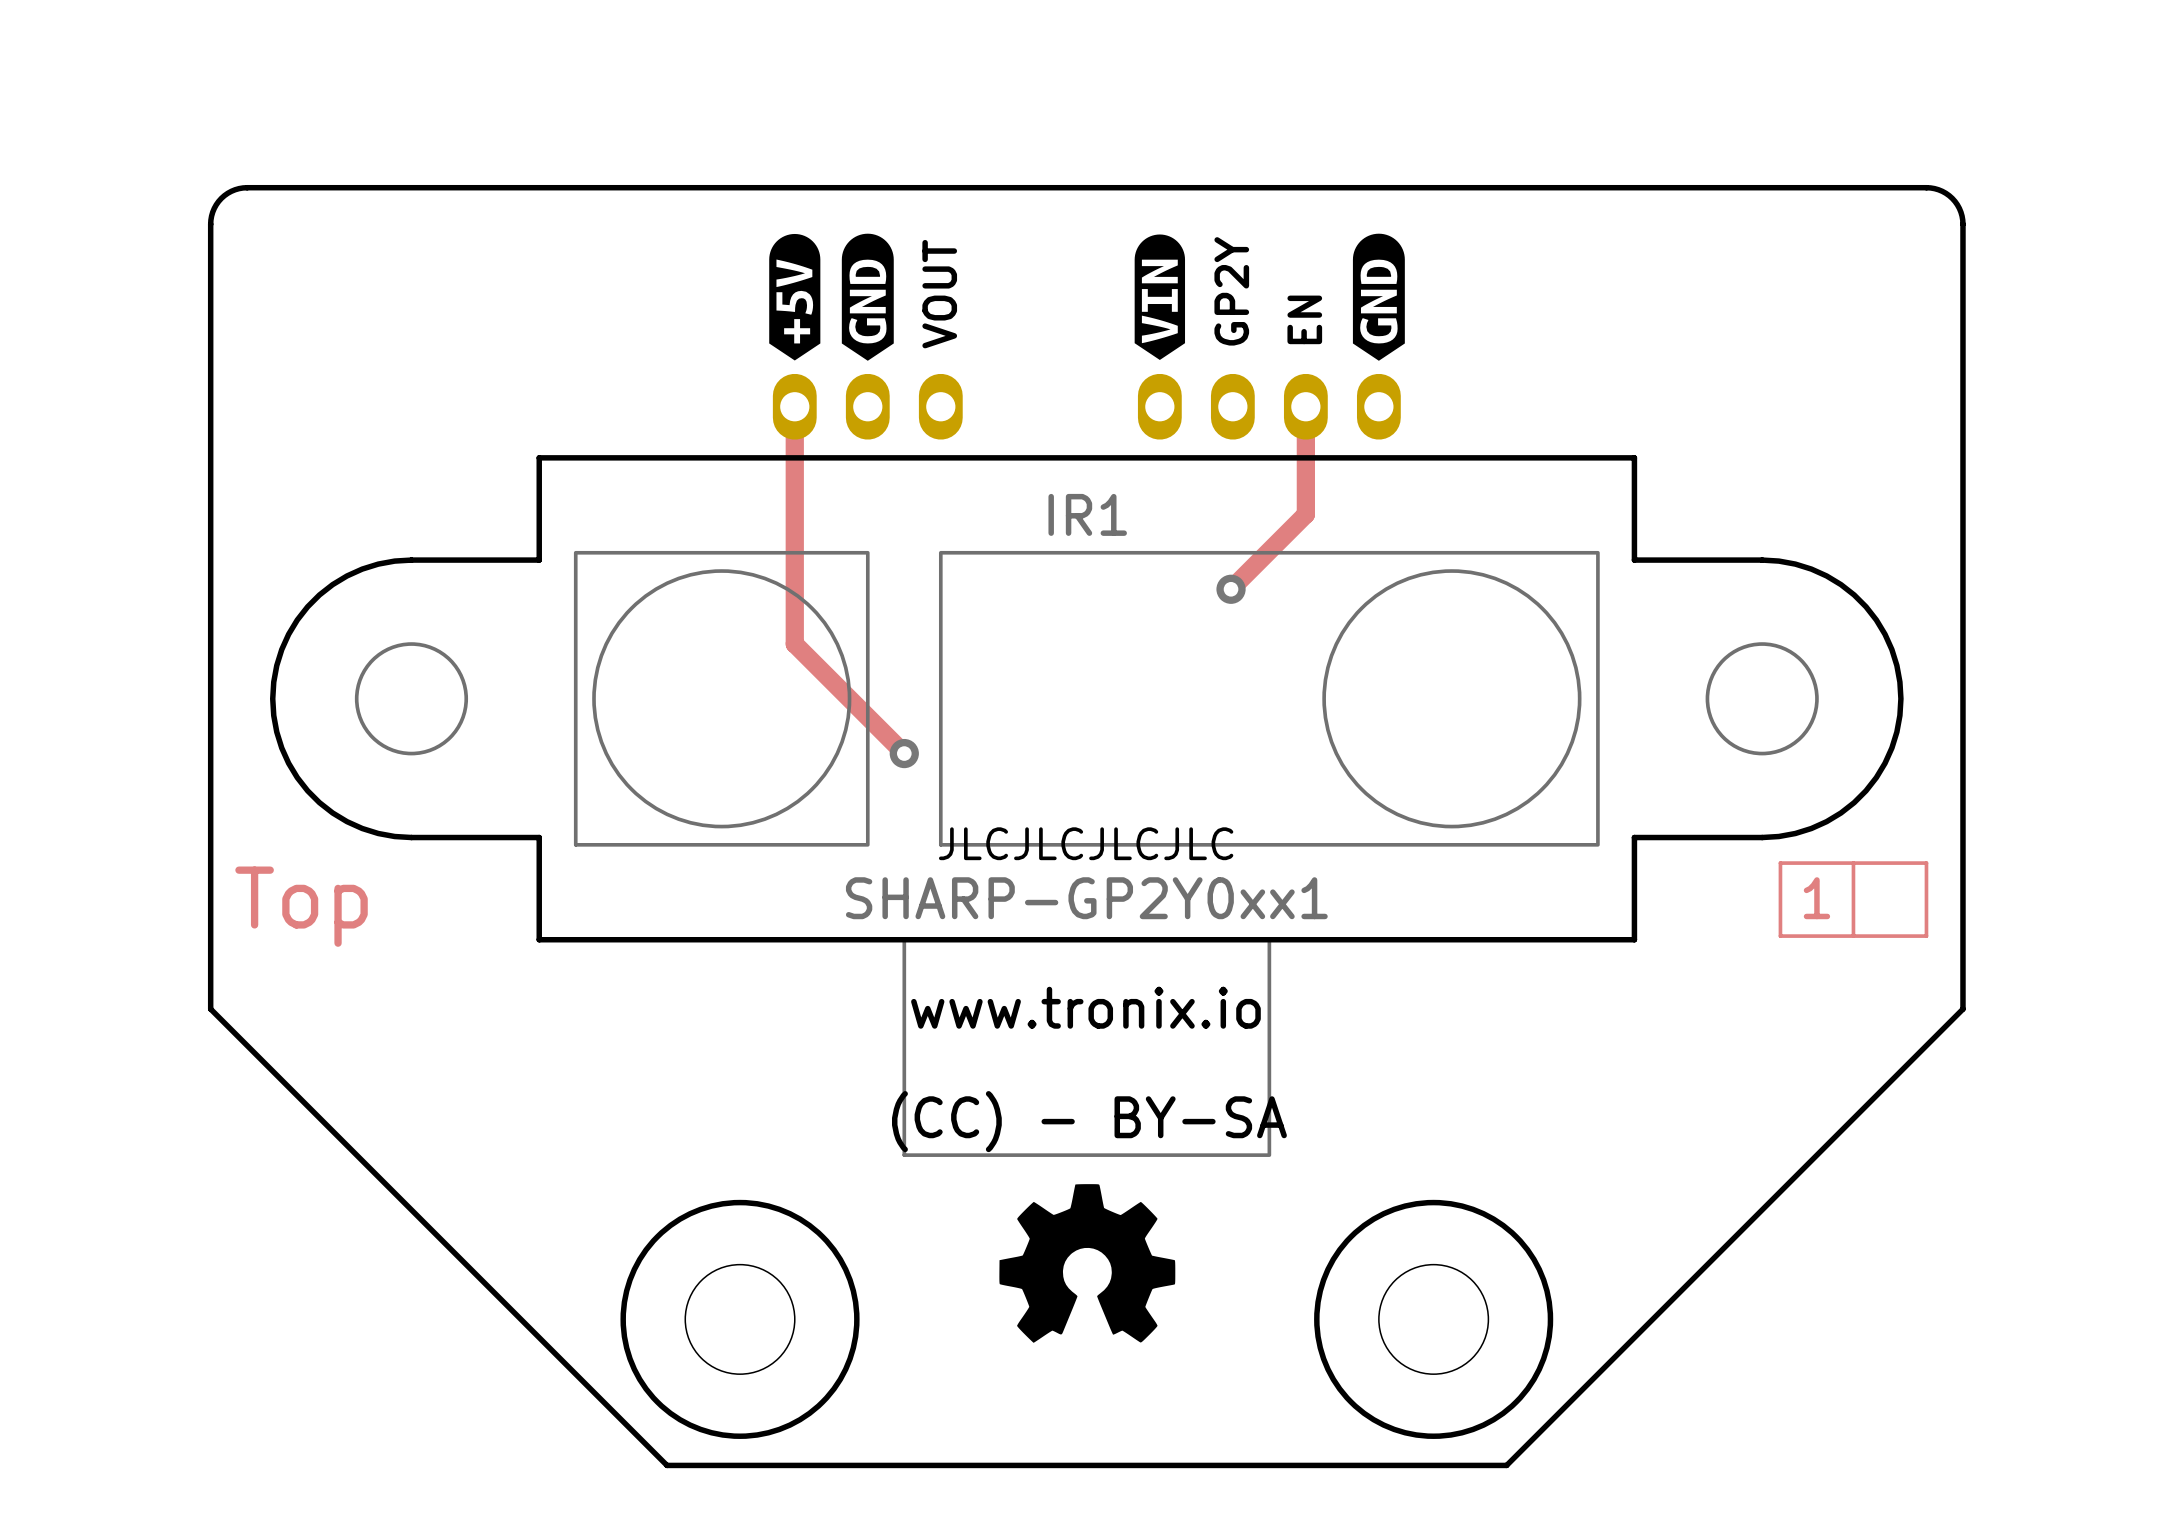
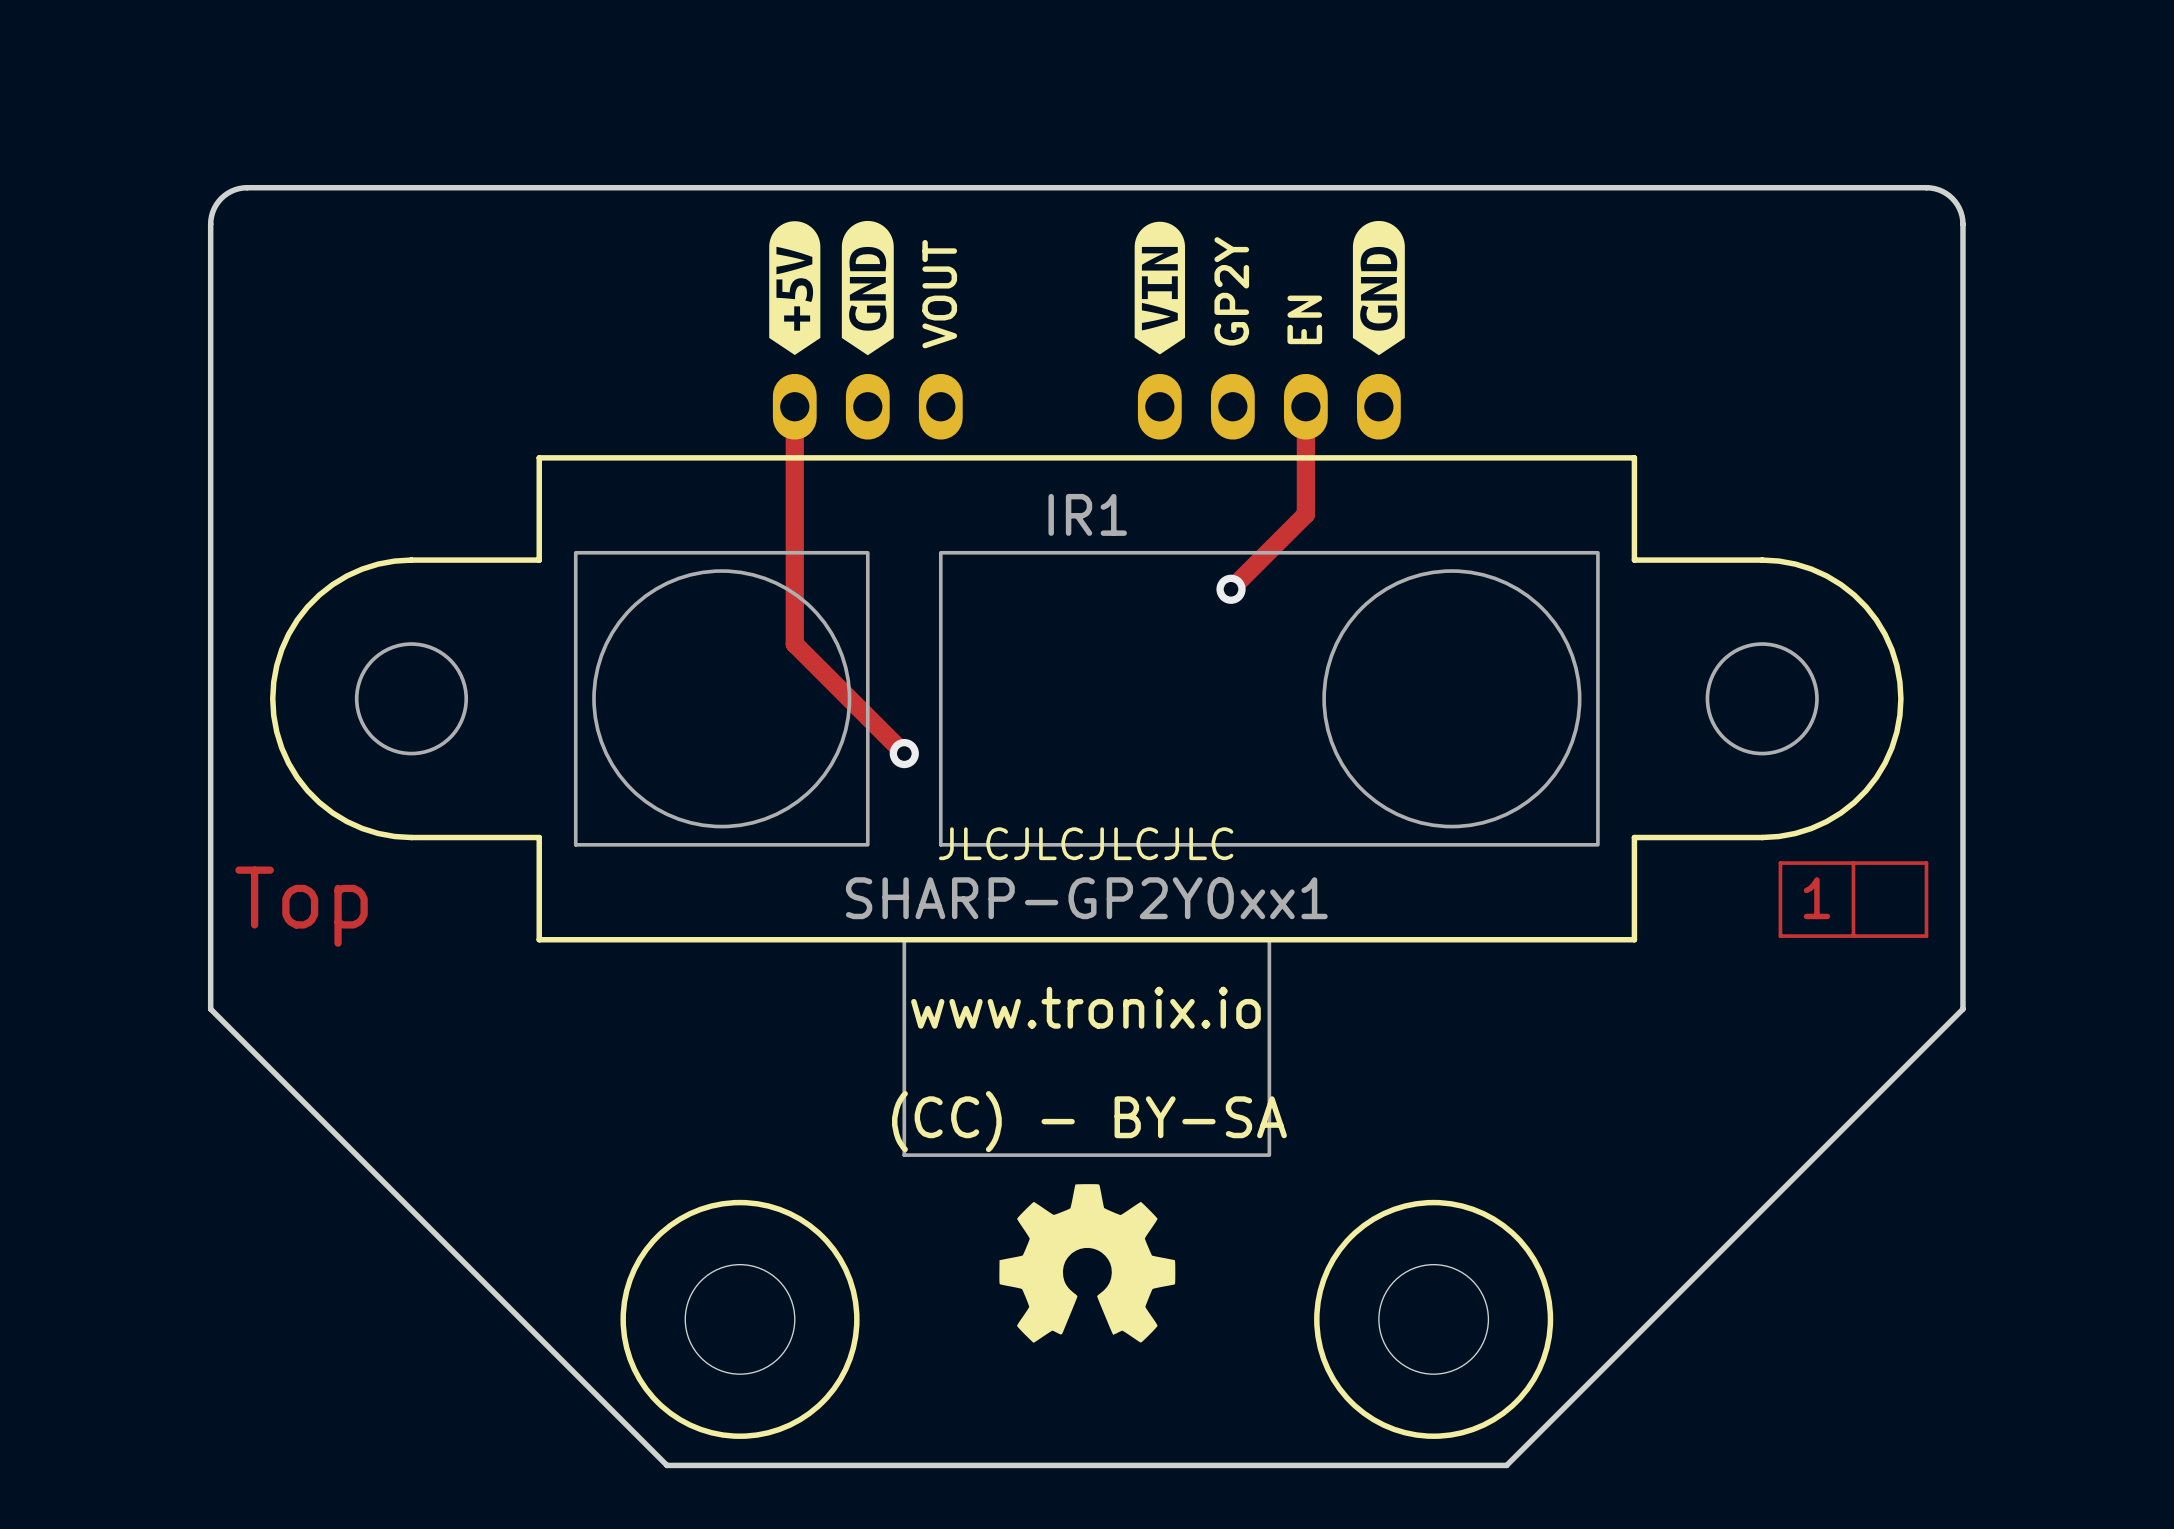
drawing shape: [769, 233, 821, 361] -> [769, 221, 821, 355]
drawing shape: [841, 233, 894, 361] -> [841, 220, 894, 356]
drawing shape: [1352, 233, 1405, 361] -> [1352, 220, 1405, 356]
drawing shape: [1134, 234, 1186, 360] -> [1134, 221, 1186, 355]

